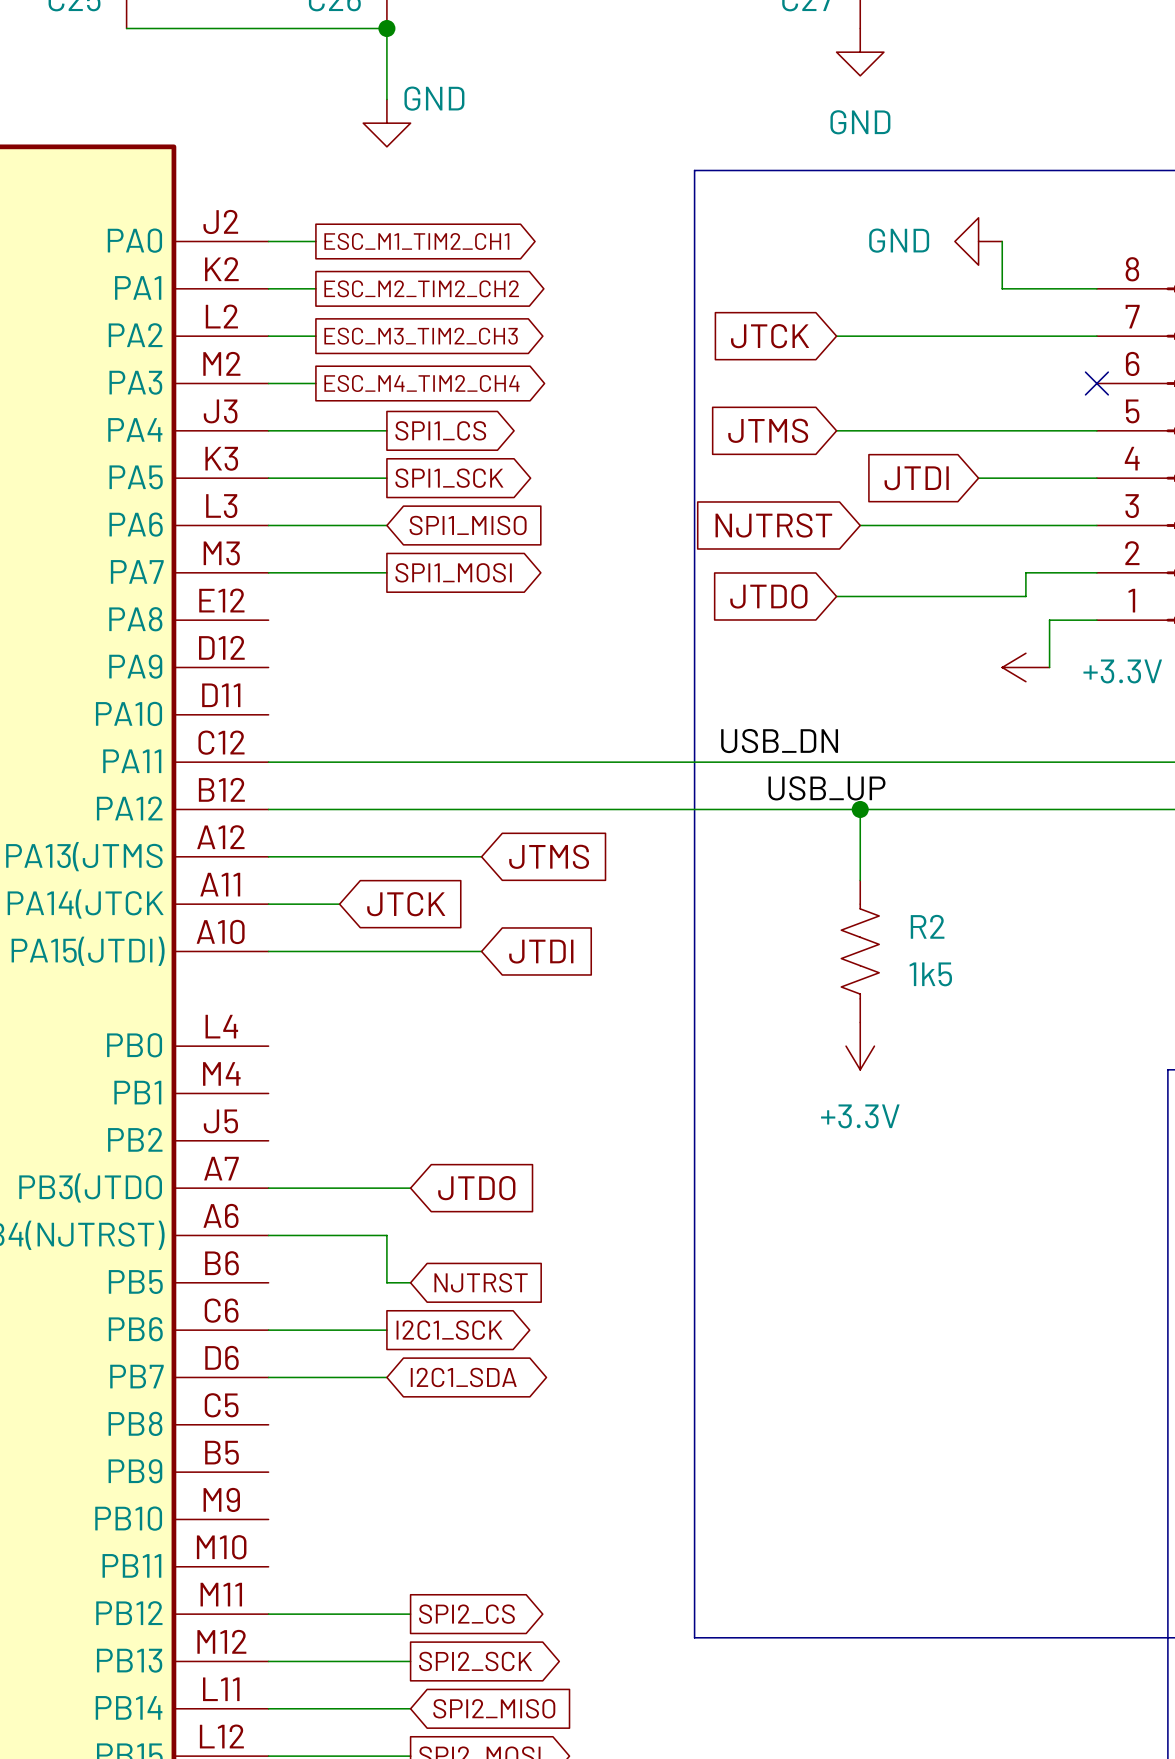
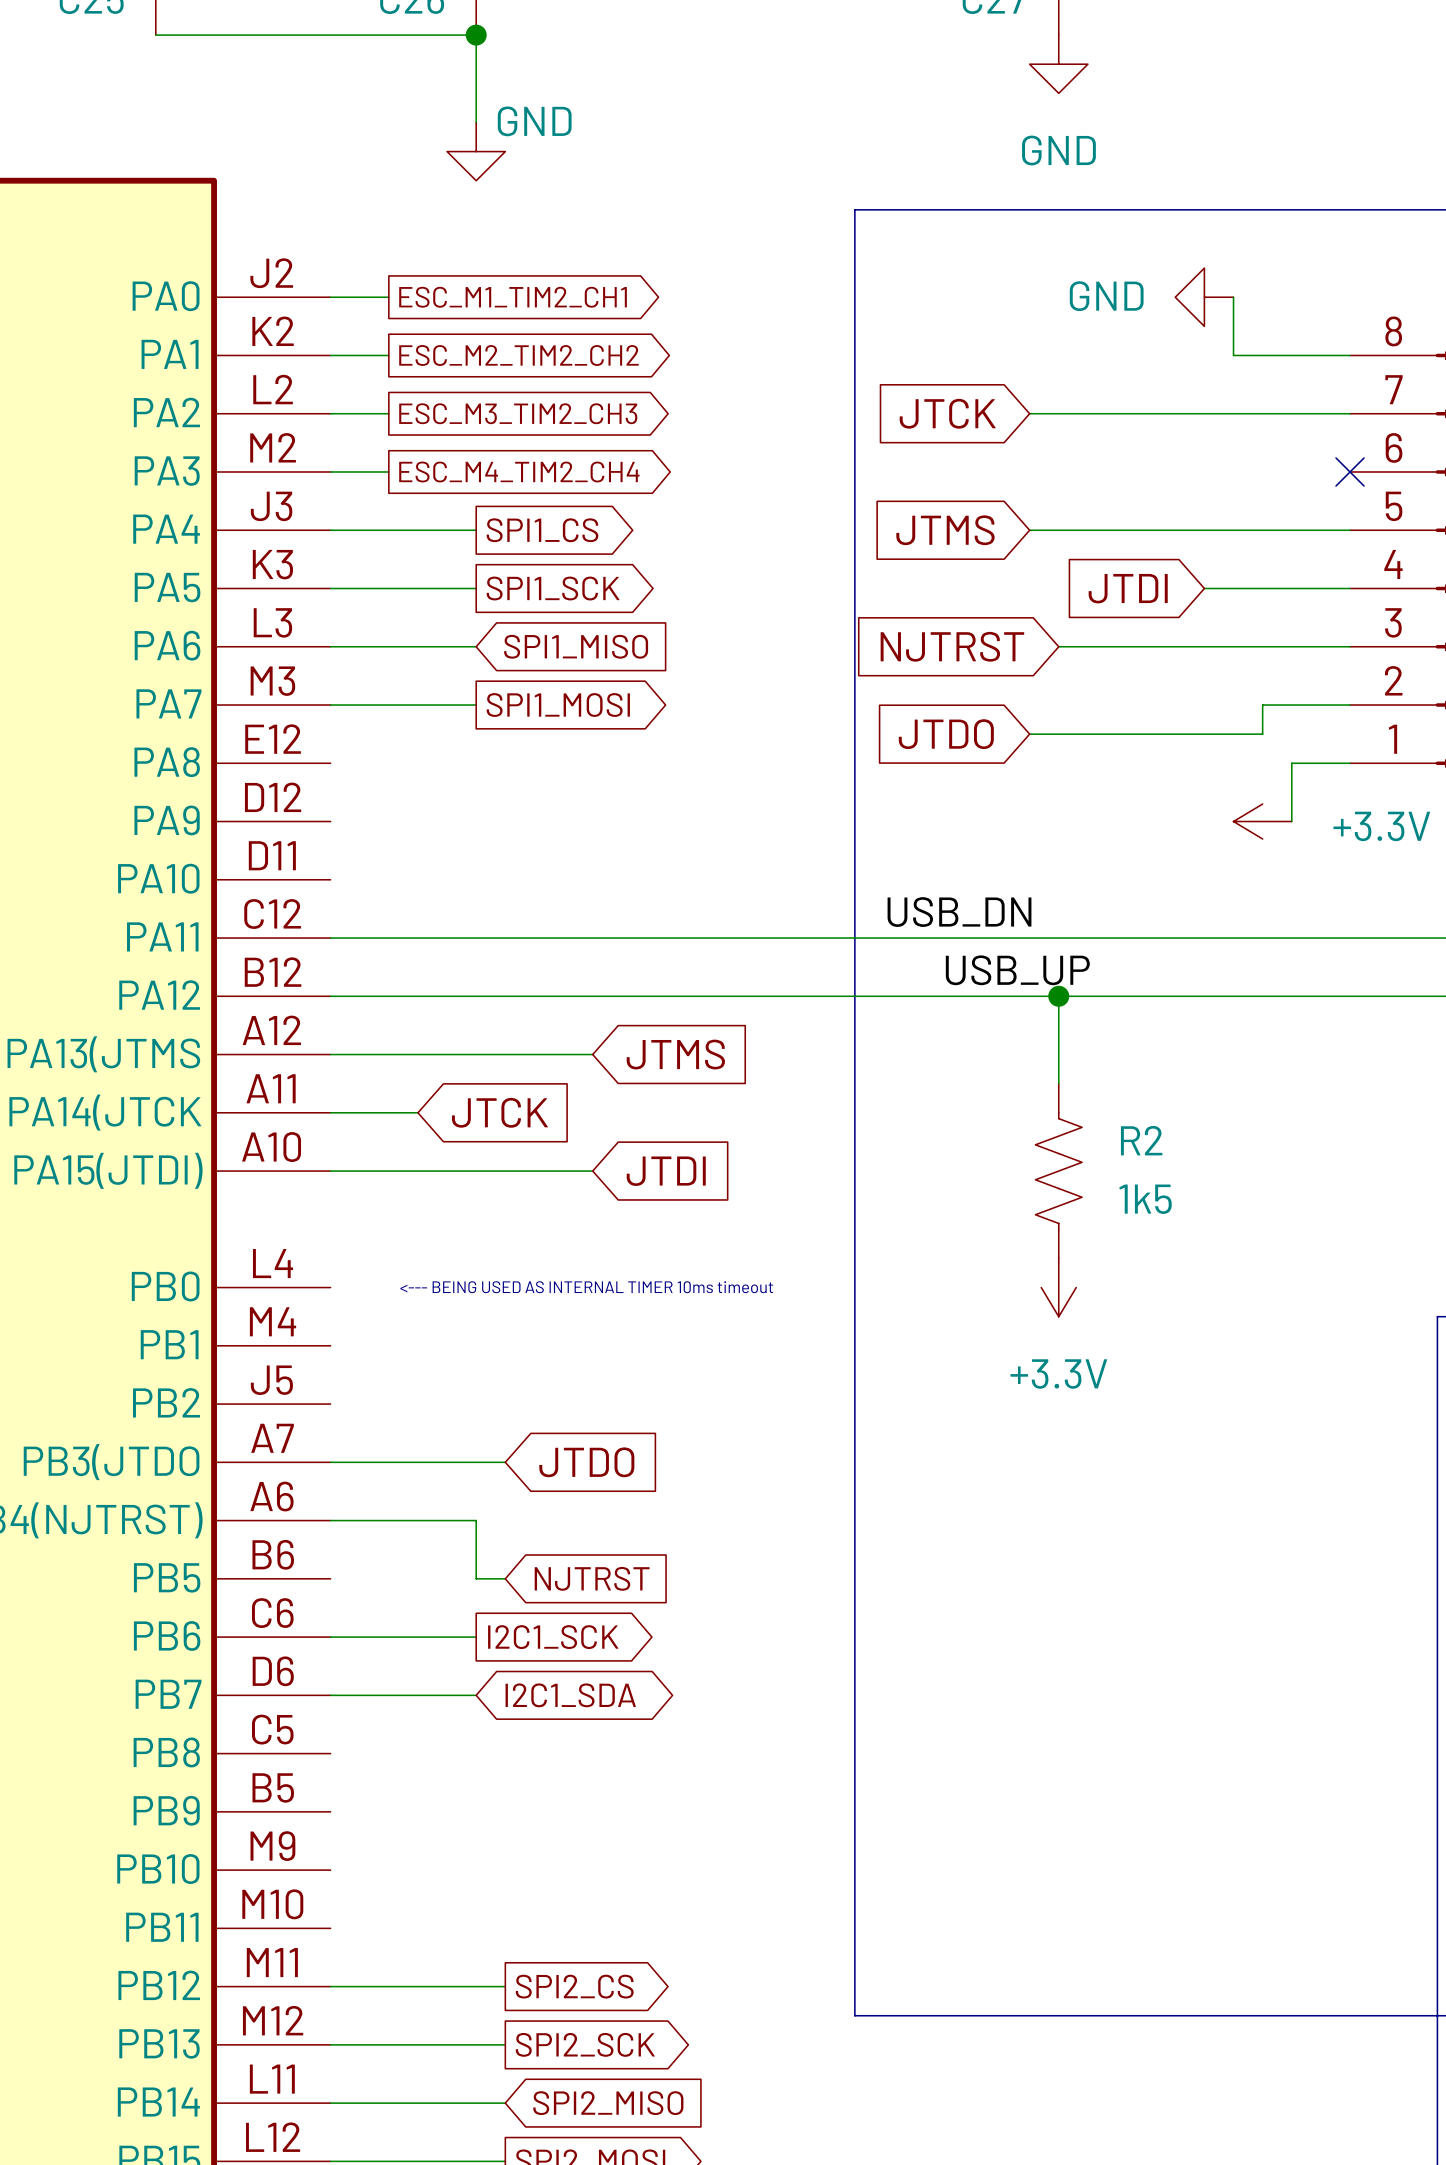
text: none -> <--- BEING USED AS INTERNAL TIMER 10ms timeout (586, 1287)

